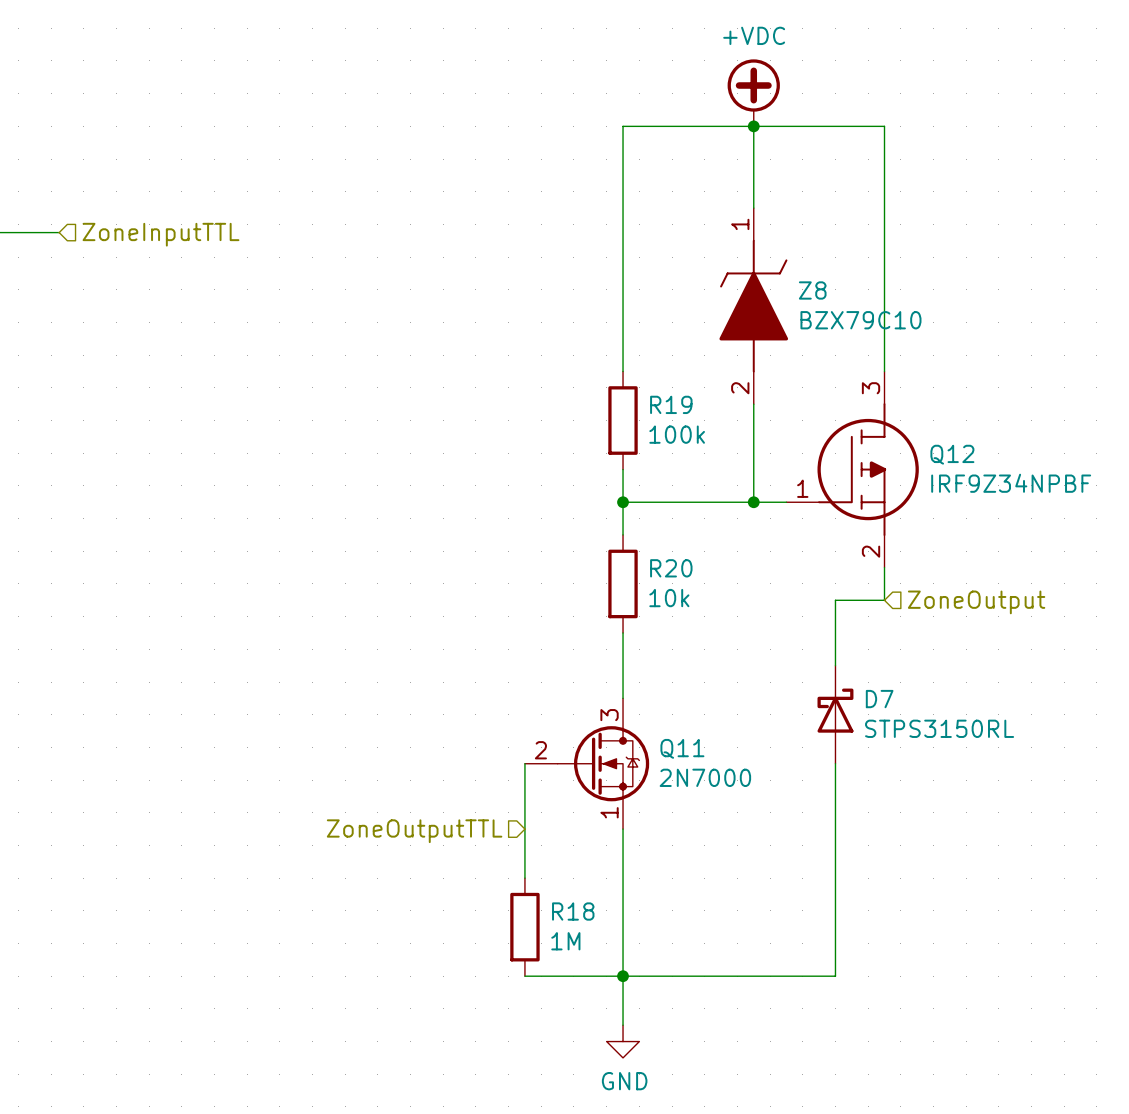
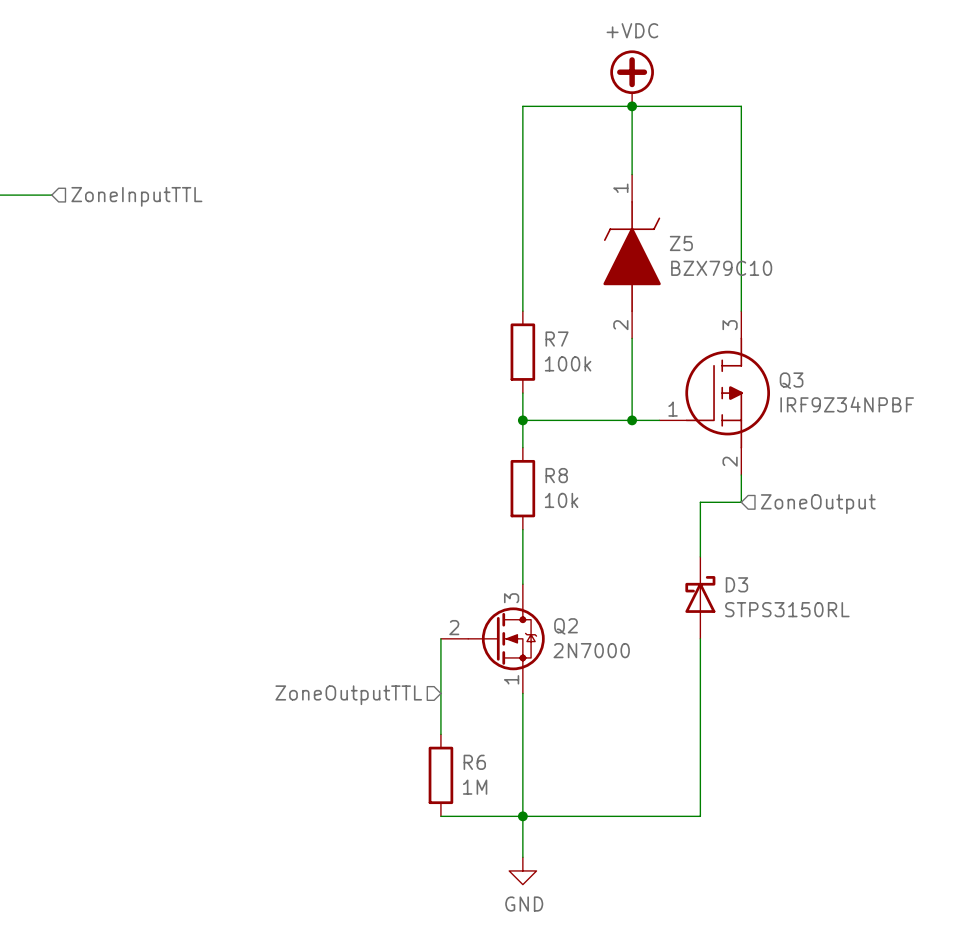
Z8 name: Z8 (812, 290) -> Z5 (681, 243)
R19 name: R19 (671, 404) -> R7 (557, 339)
Q12 name: Q12 (952, 454) -> Q3 (791, 380)
R20 name: R20 (671, 568) -> R8 (556, 475)
D7 name: D7 (879, 699) -> D3 (736, 584)
Q11 name: Q11 (682, 748) -> Q2 (566, 626)
R18 name: R18 (573, 911) -> R6 (474, 762)

